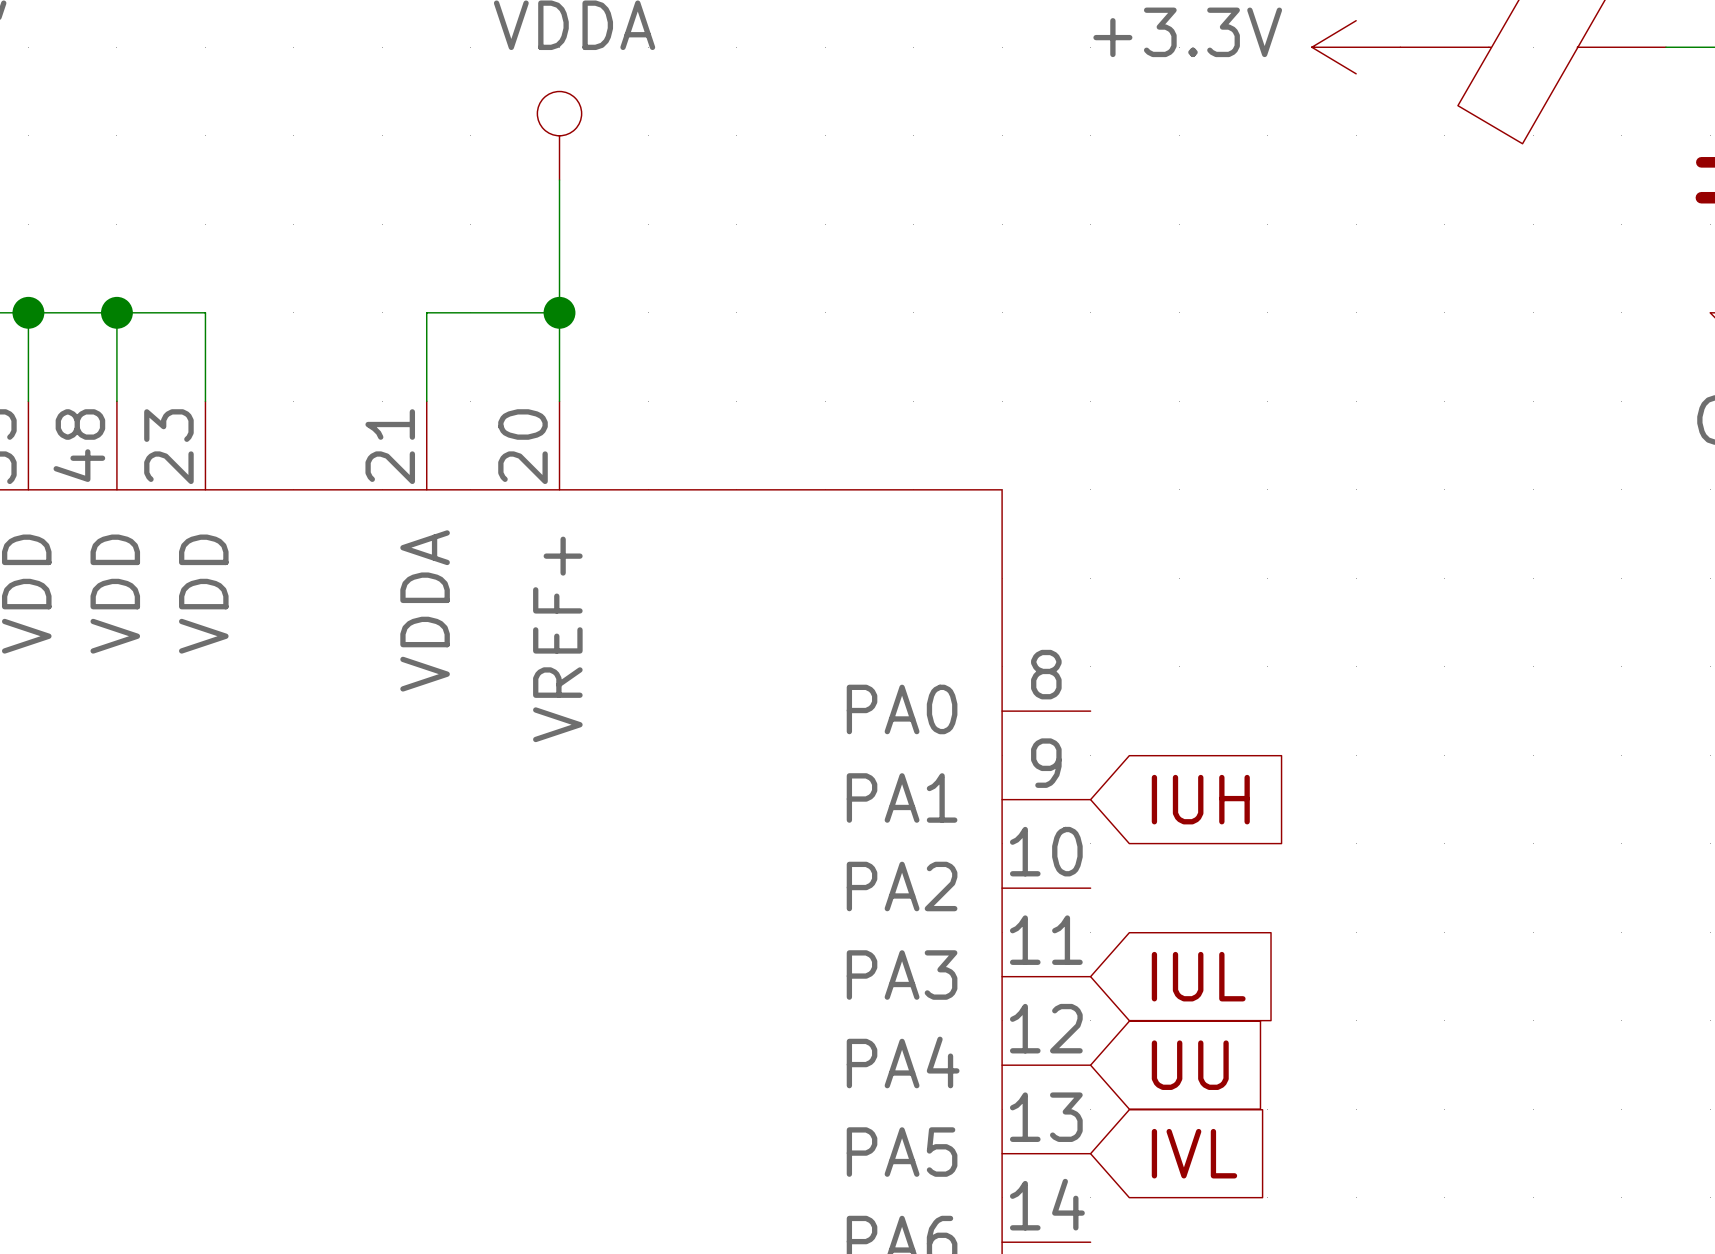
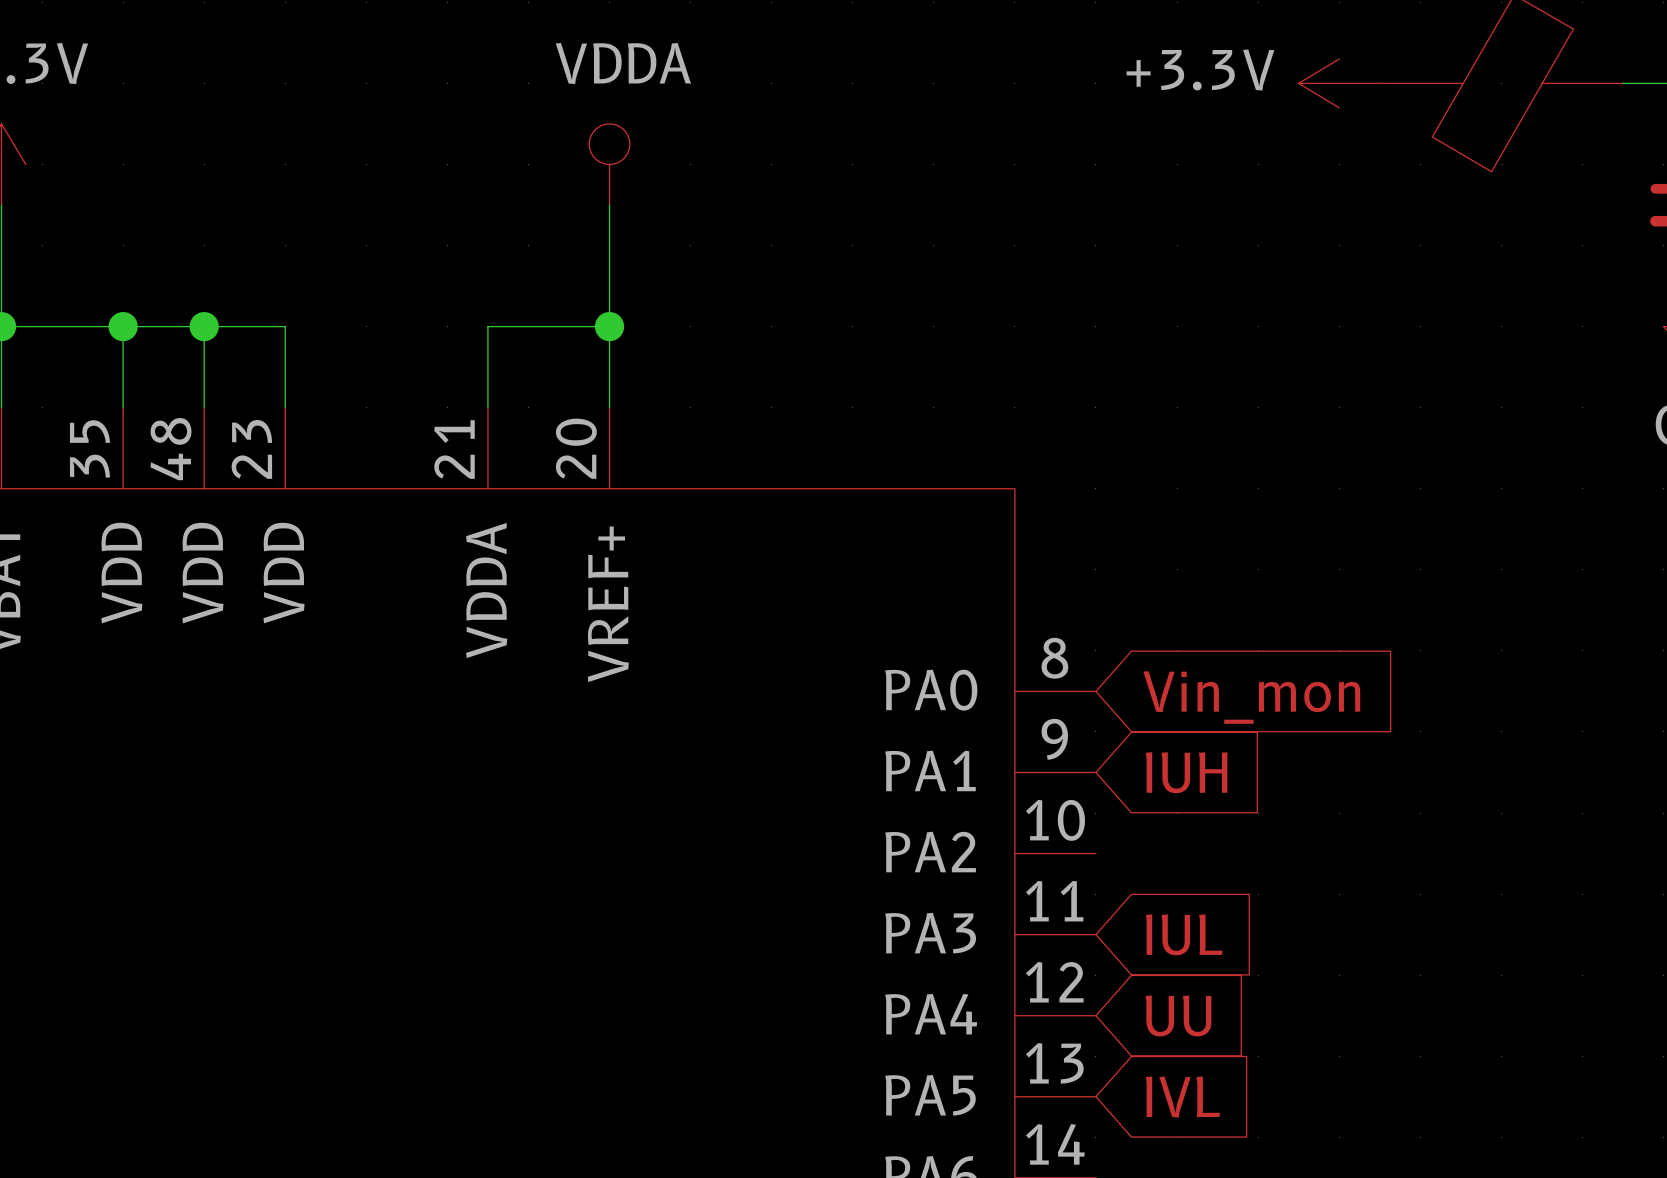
global label: none -> Vin_mon (1251, 697)

